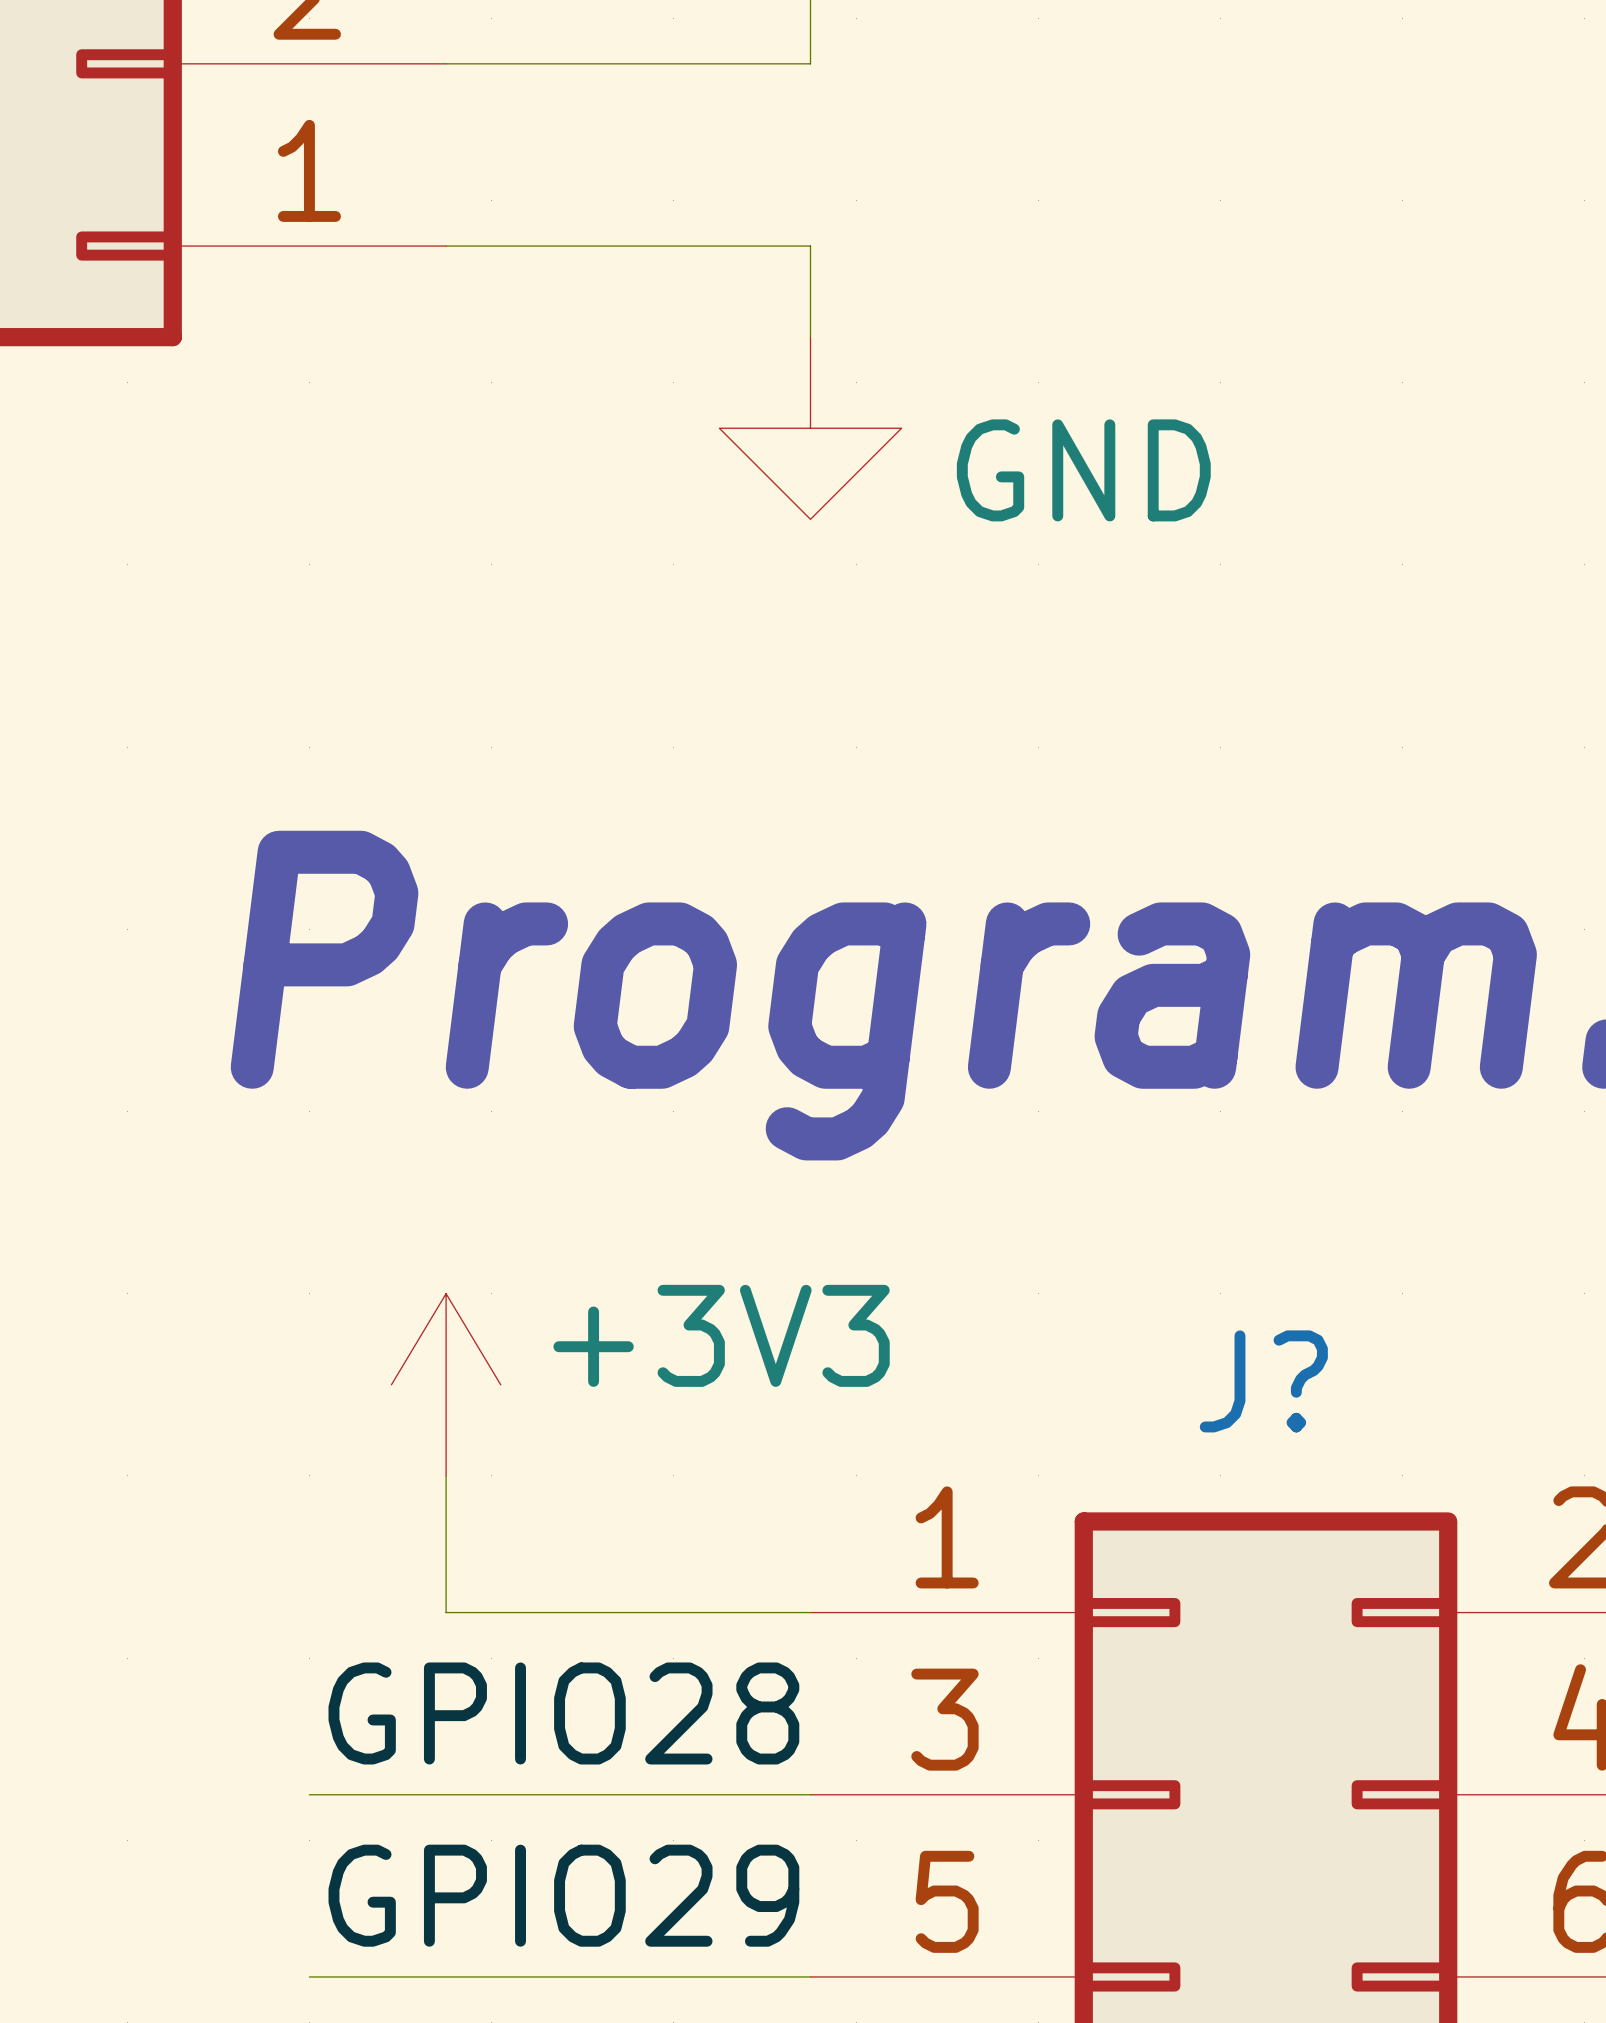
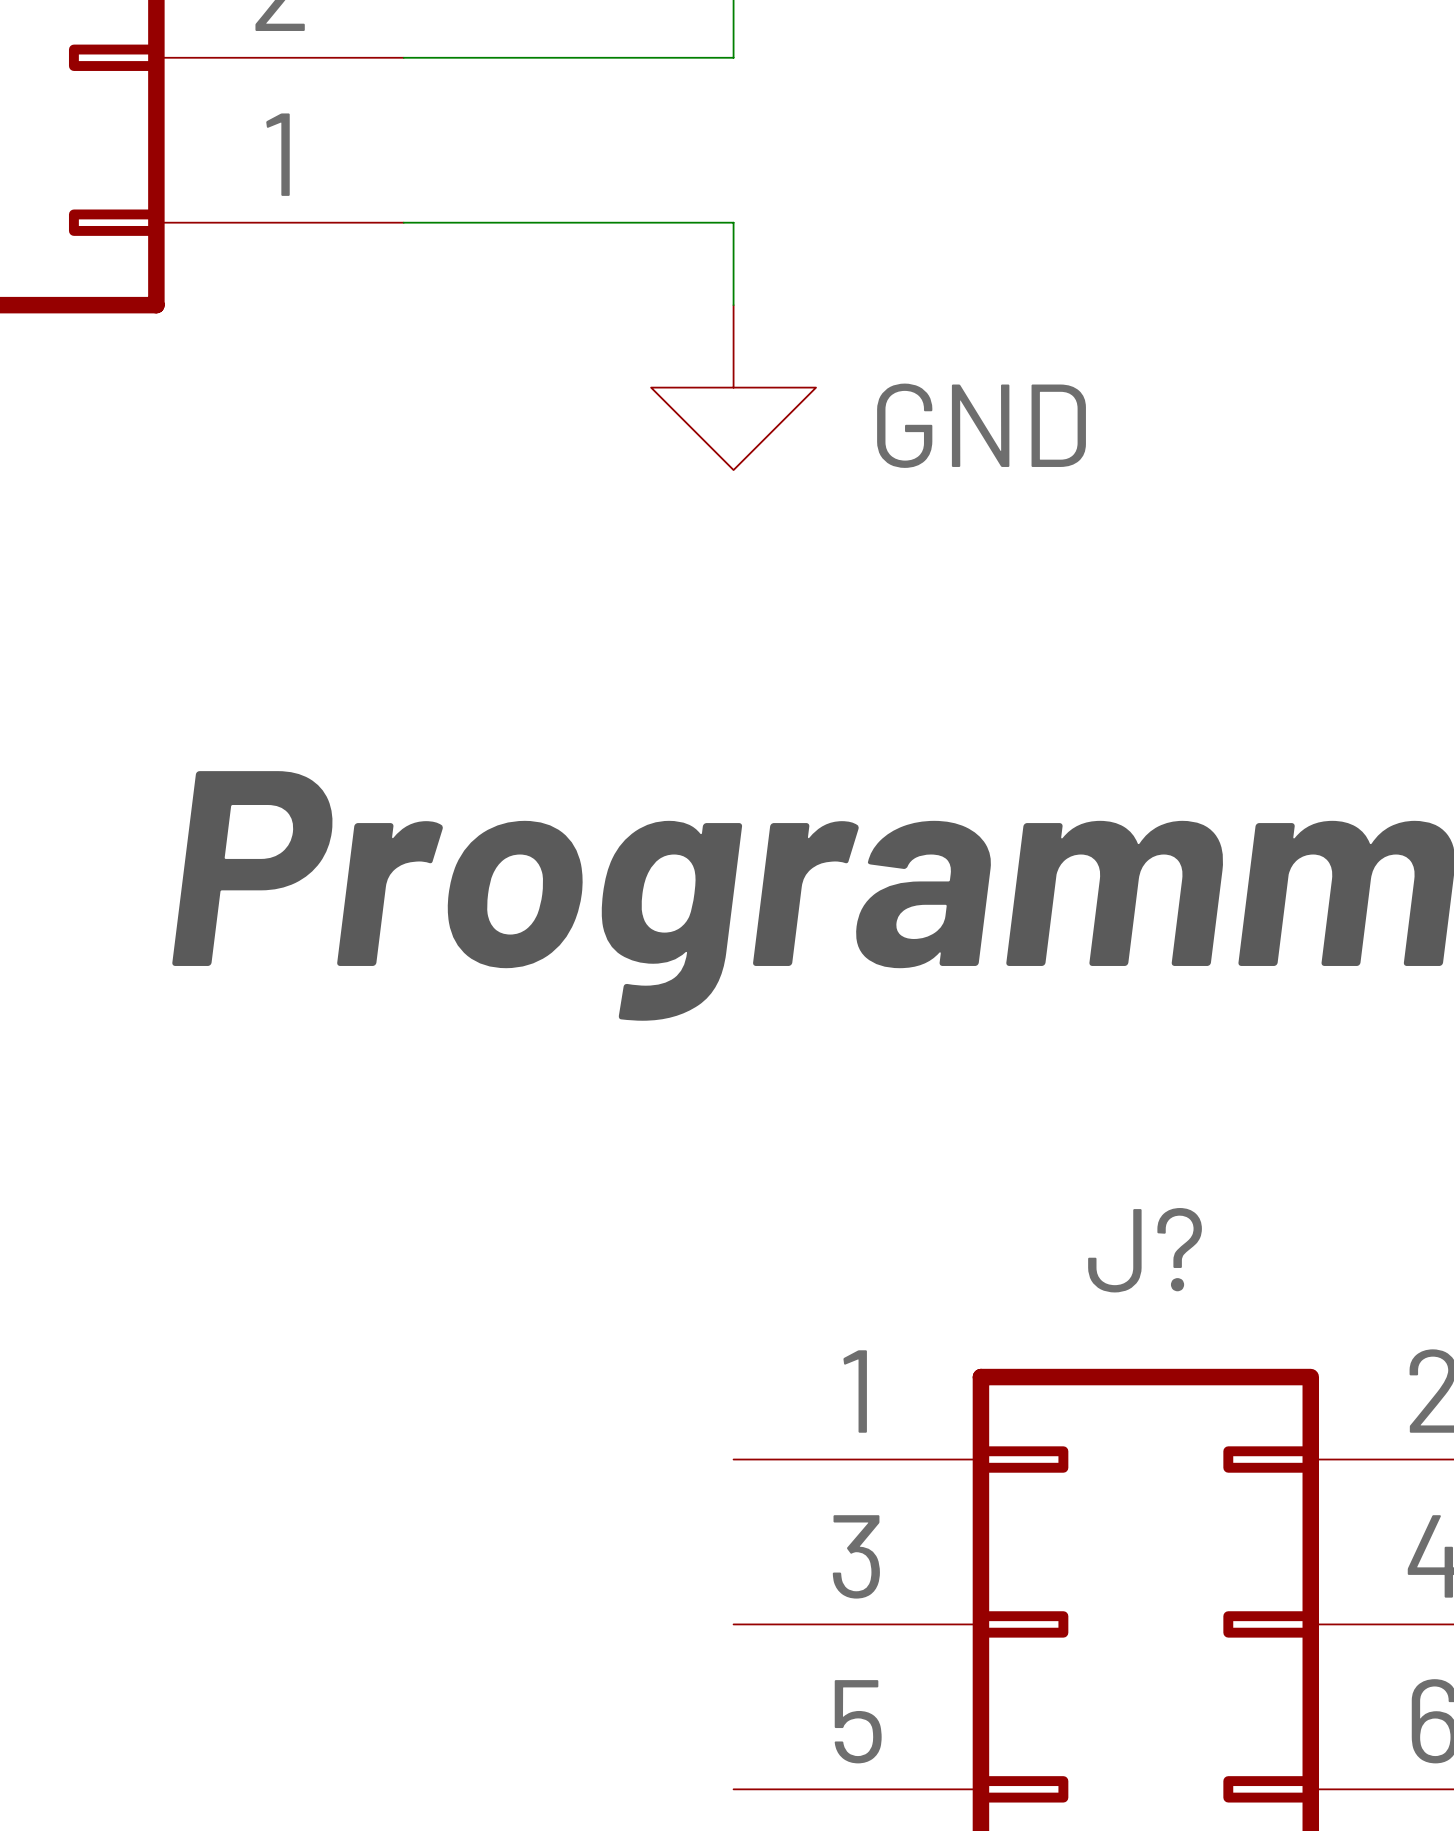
power symbol: +3V3 (446, 1384) -> none
wire: (446, 1475) (446, 1612) (810, 1612) -> none
label: GPIO28 (563, 1713) -> none
wire: (309, 1794) (810, 1794) -> none
label: GPIO29 (563, 1895) -> none
wire: (309, 1976) (810, 1976) -> none

